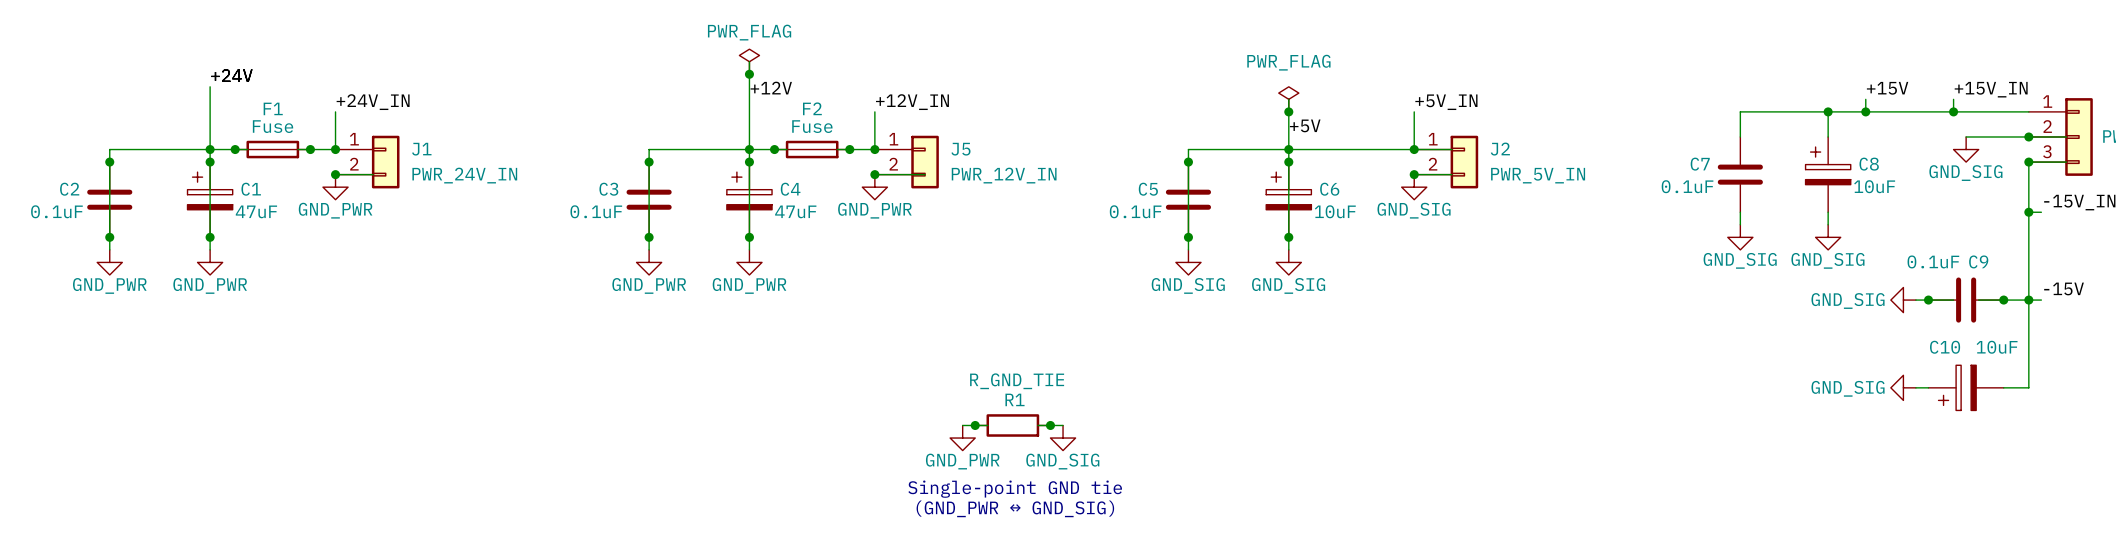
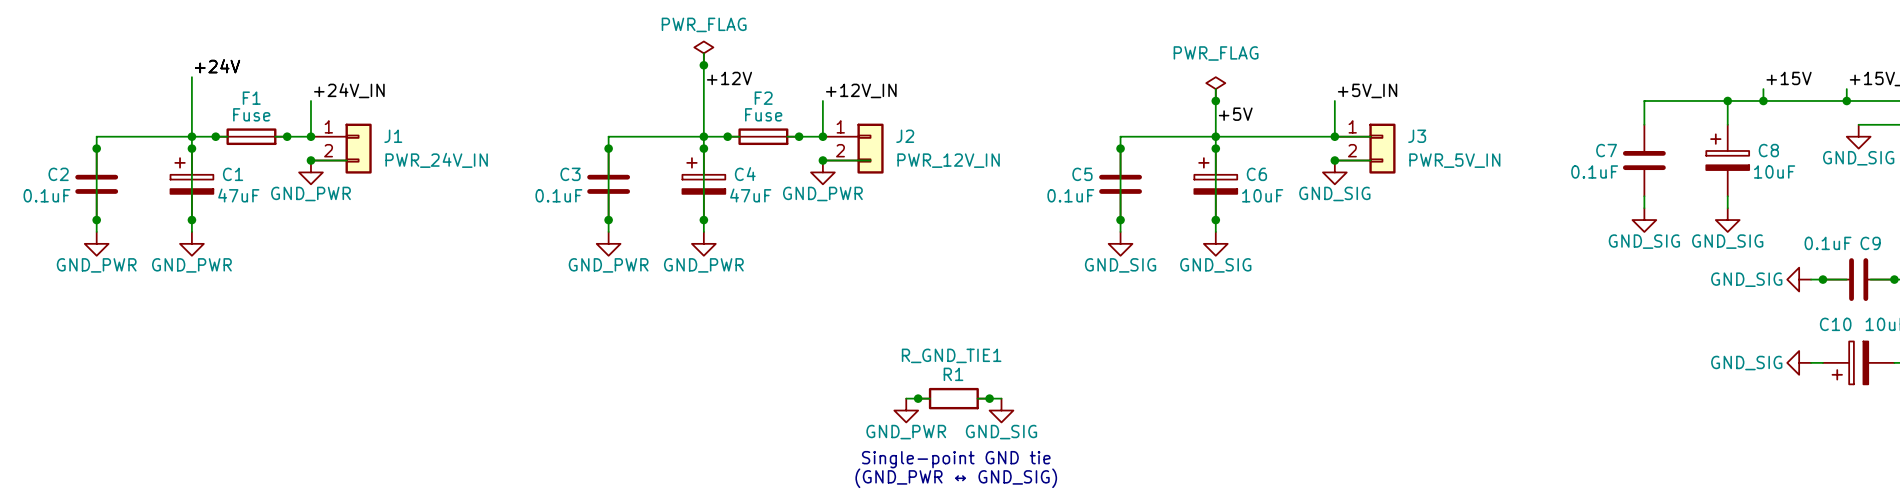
J5 name: J5 (960, 149) -> J2 (905, 136)
J2 name: J2 (1500, 149) -> J3 (1417, 136)
R_GND_TIE name: R_GND_TIE (1017, 381) -> R_GND_TIE1 (951, 355)

